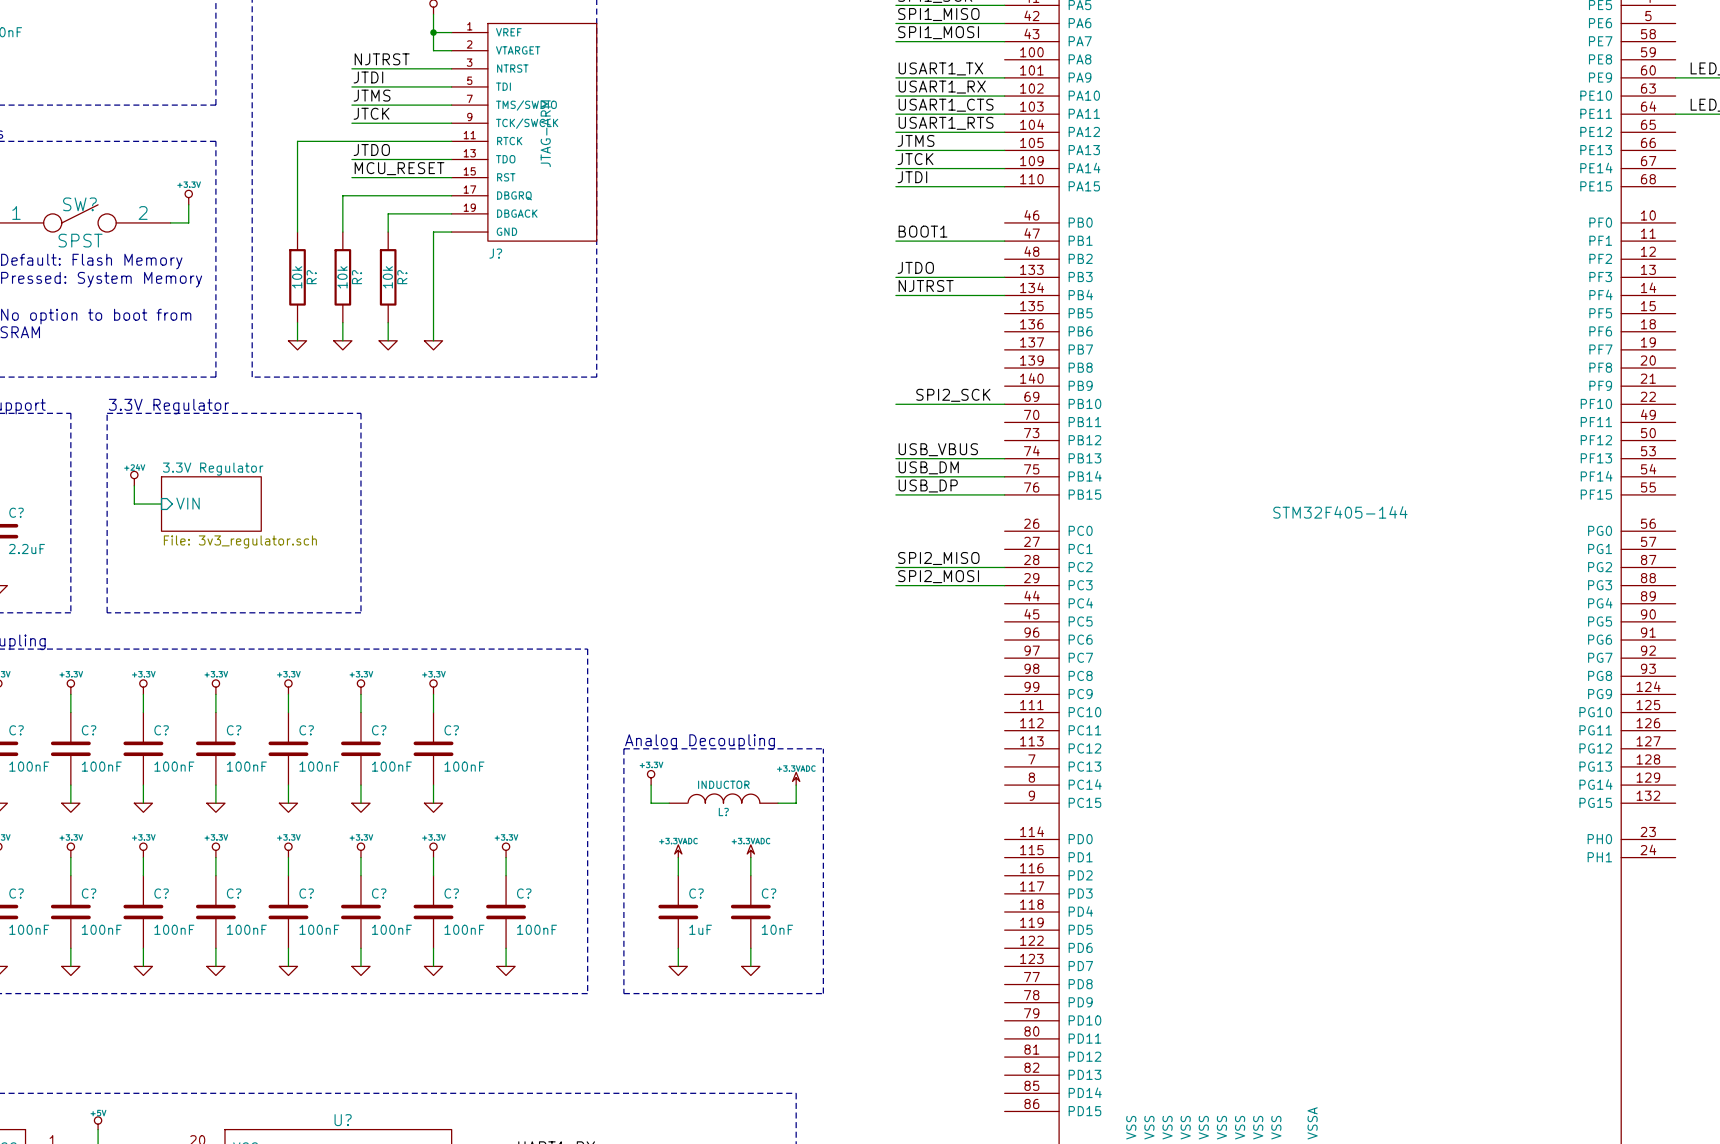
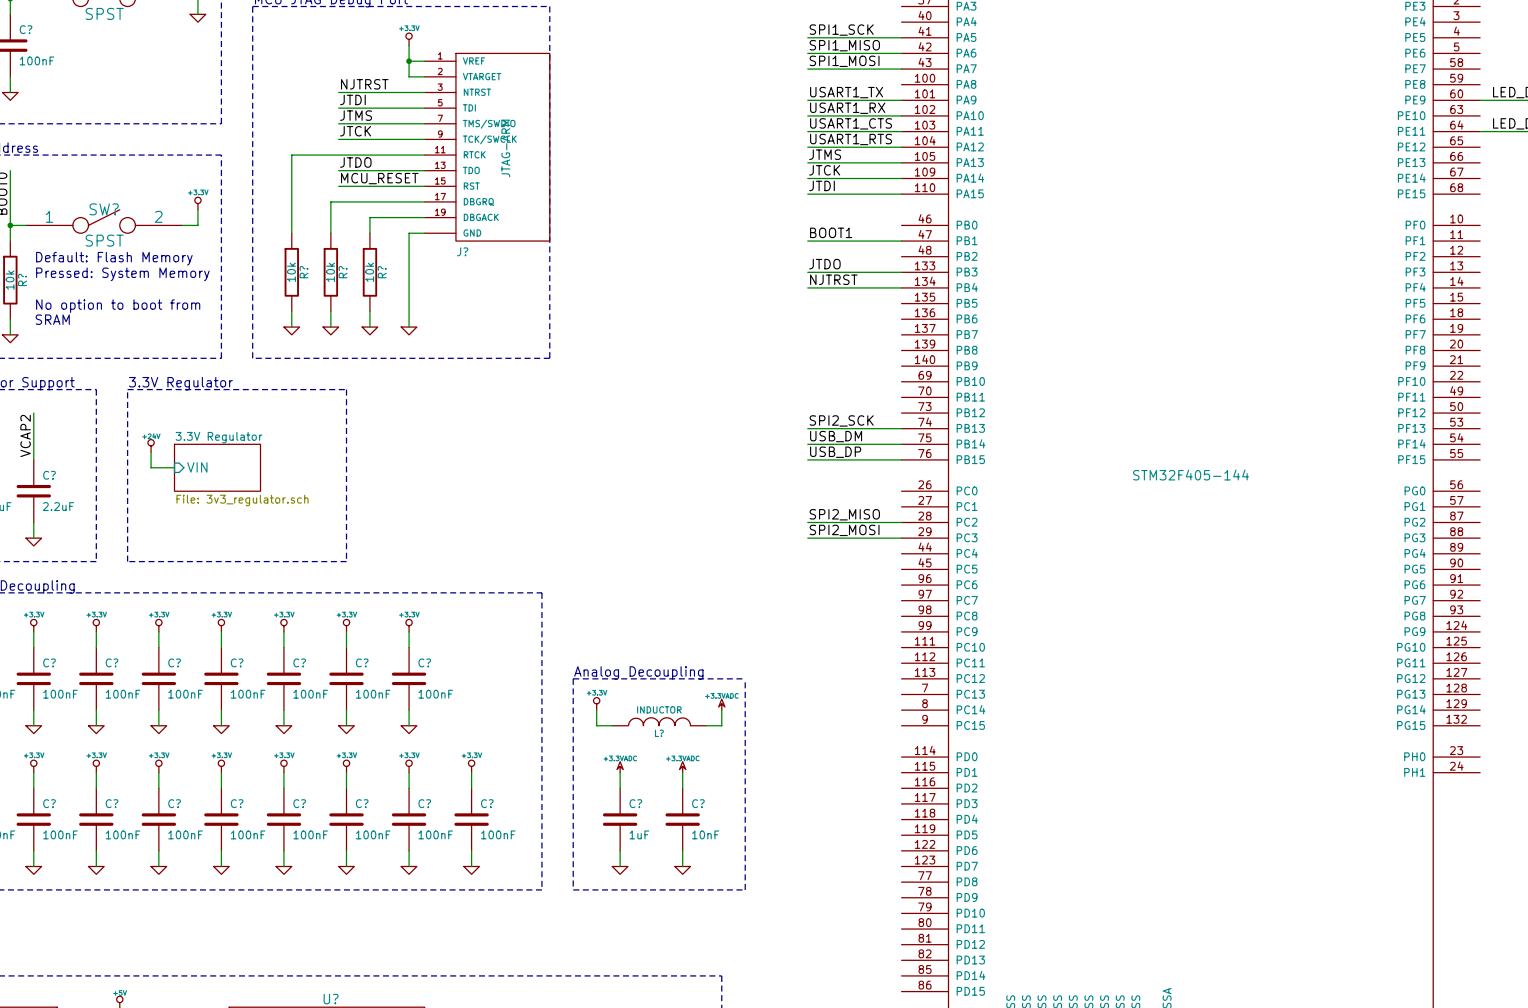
label: SPI2_SCK (953, 395) -> none
wire: (895, 404) (1004, 404) -> none
label: USB_VBUS (938, 449) -> SPI2_SCK (841, 420)

